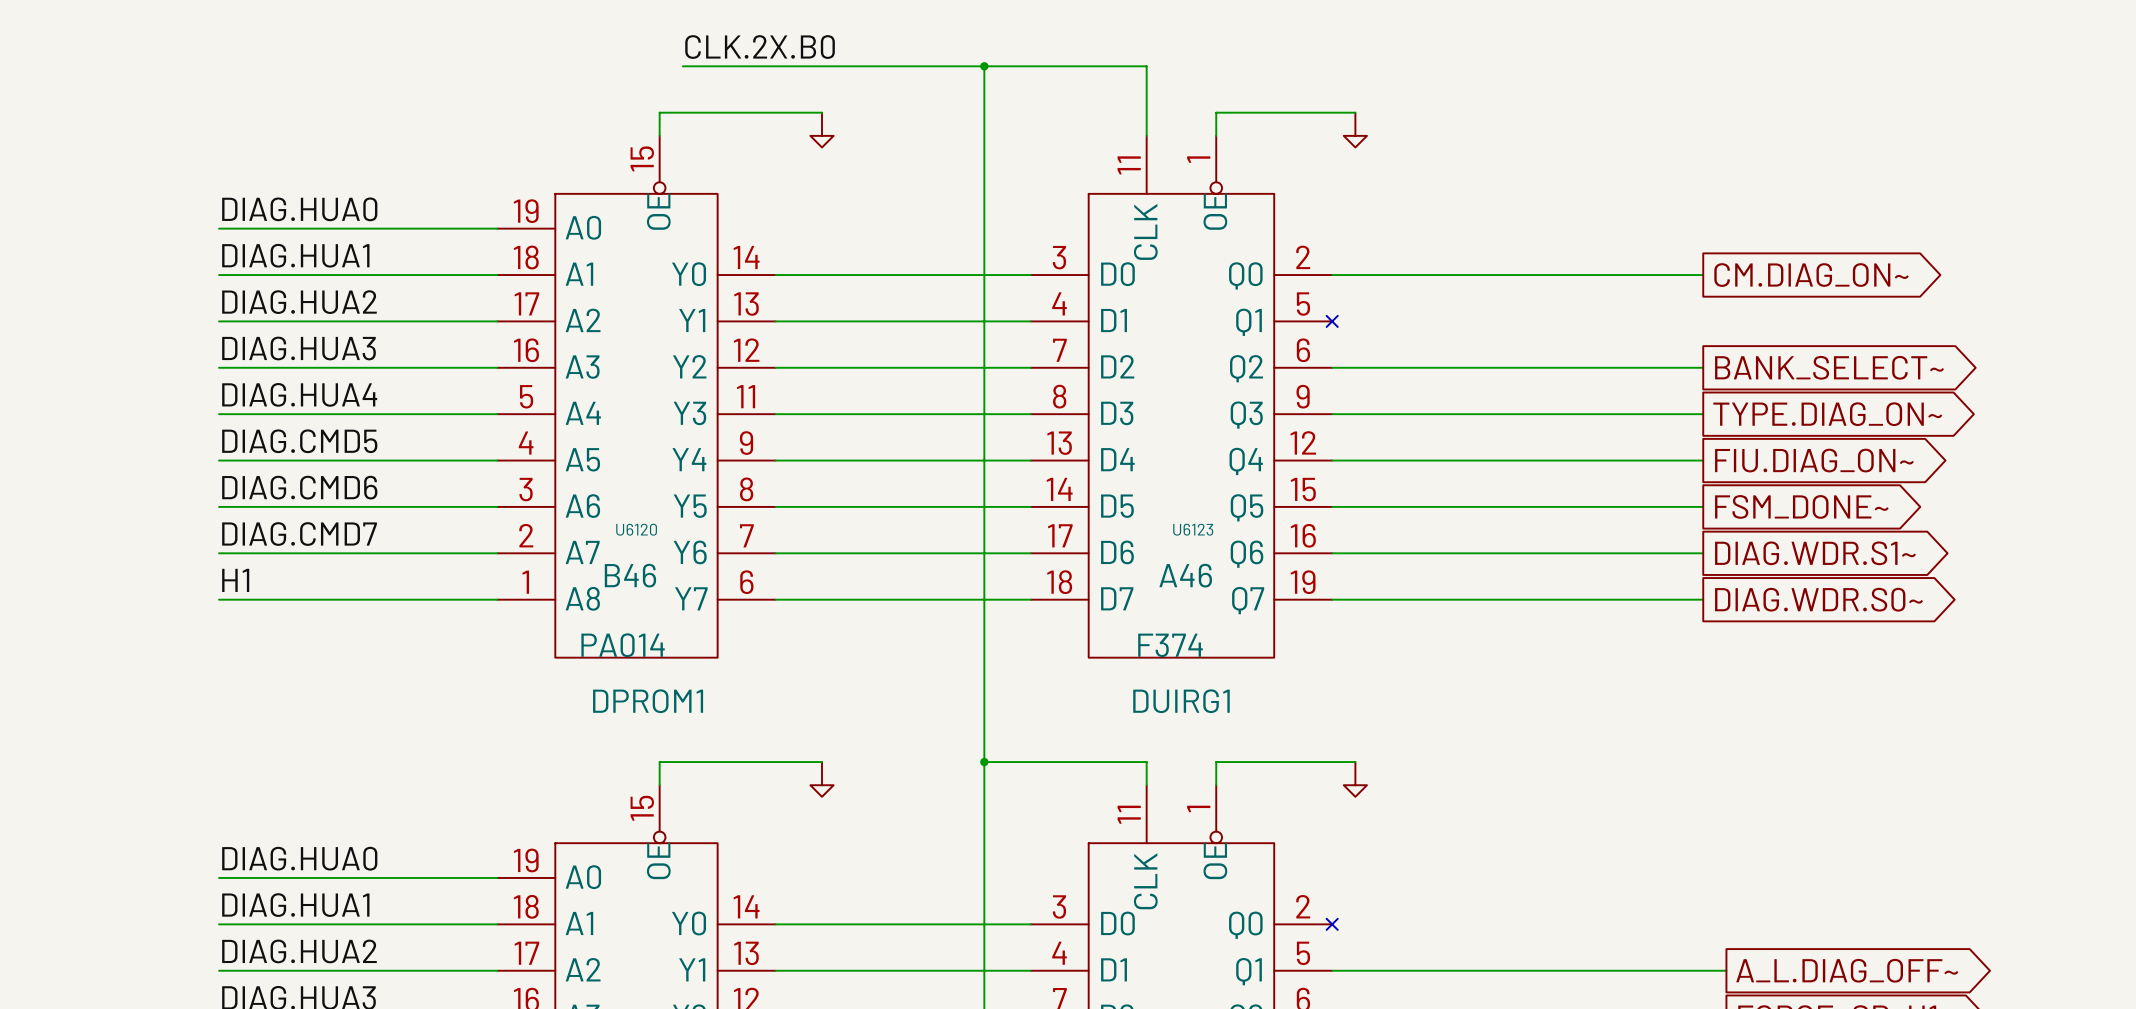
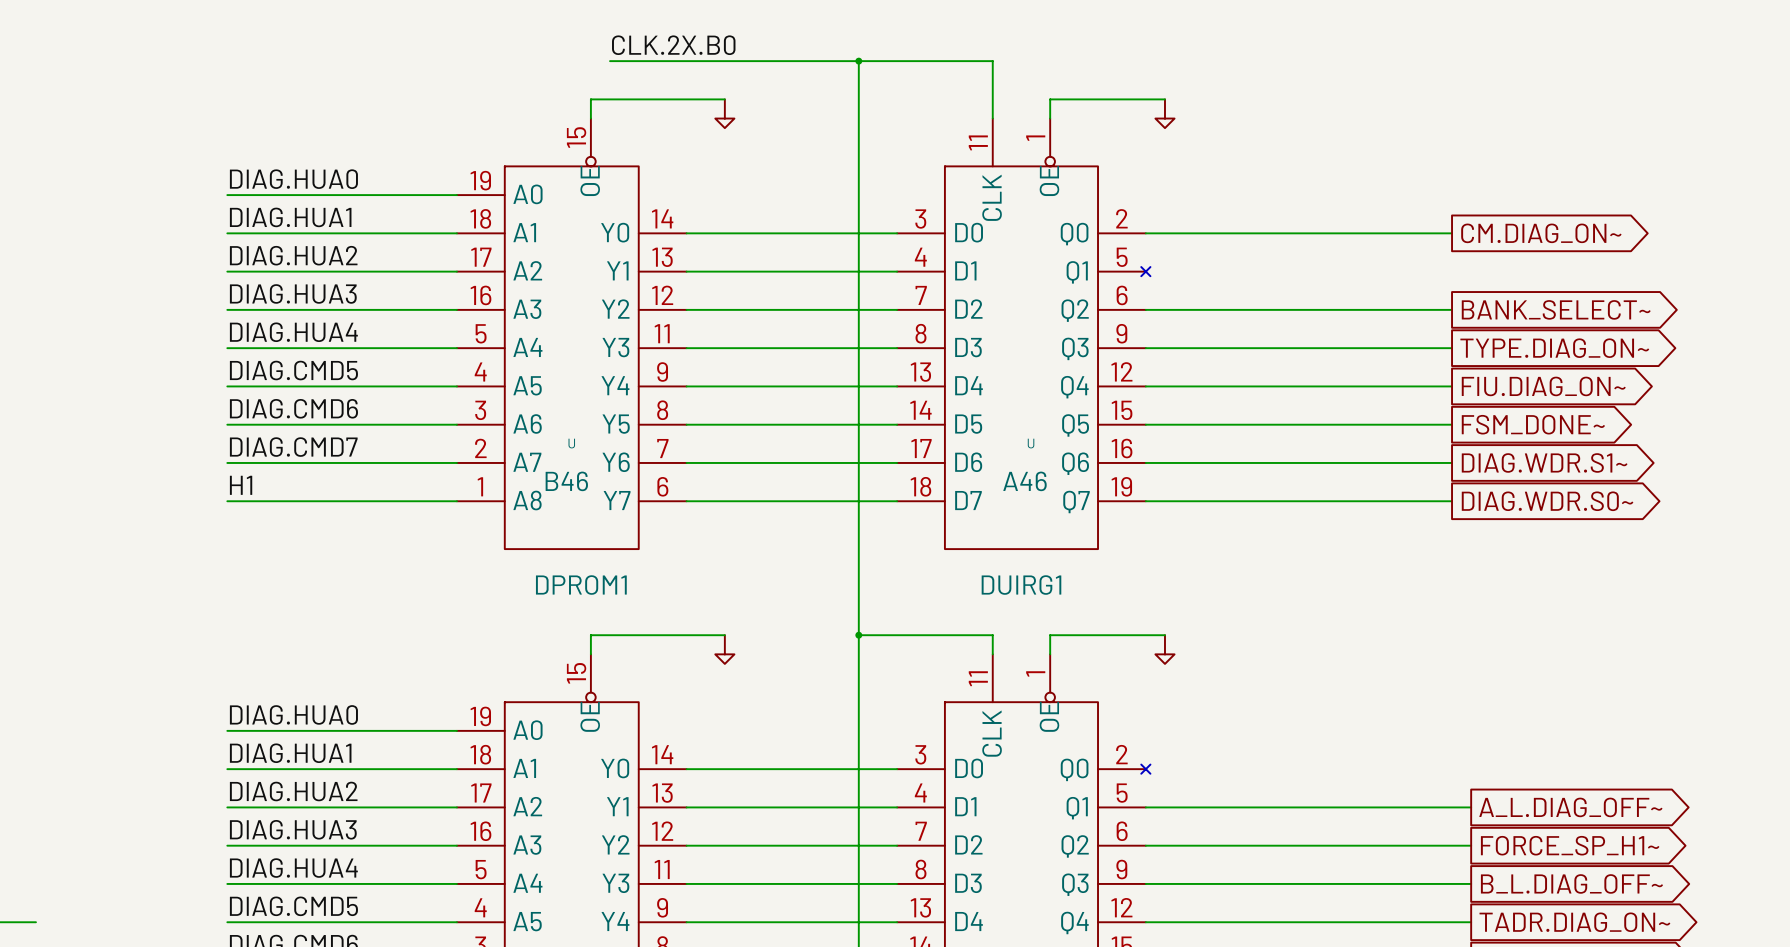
U6120 name: U6120 (636, 529) -> U (571, 443)
U6123 name: U6123 (1193, 529) -> U (1031, 443)
U6120 value: PA014 (623, 645) -> none
U6123 value: F374 (1170, 645) -> none

